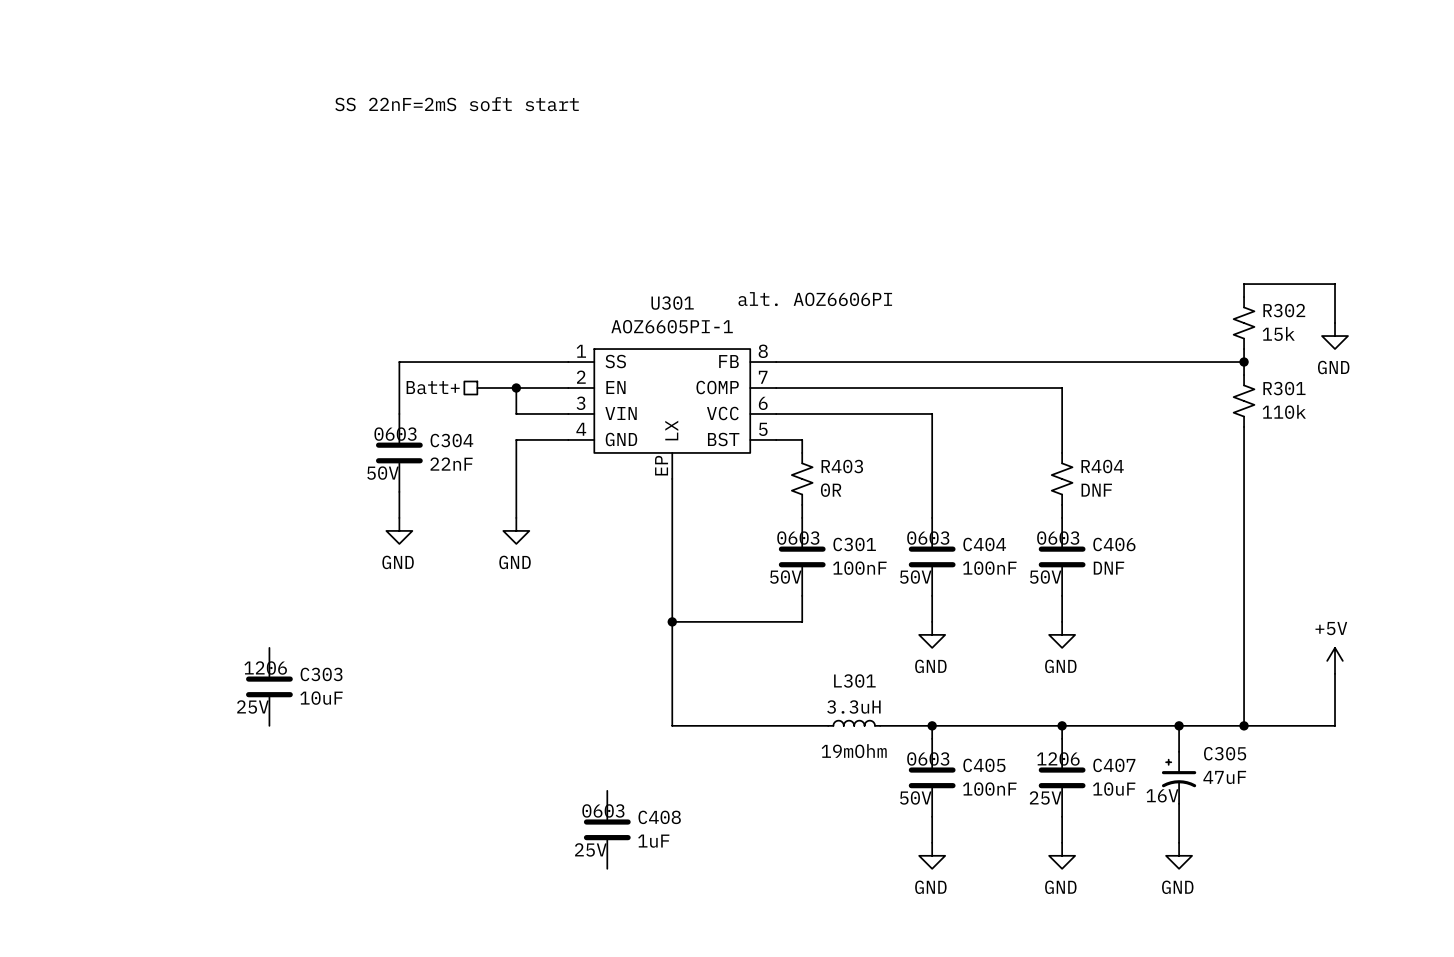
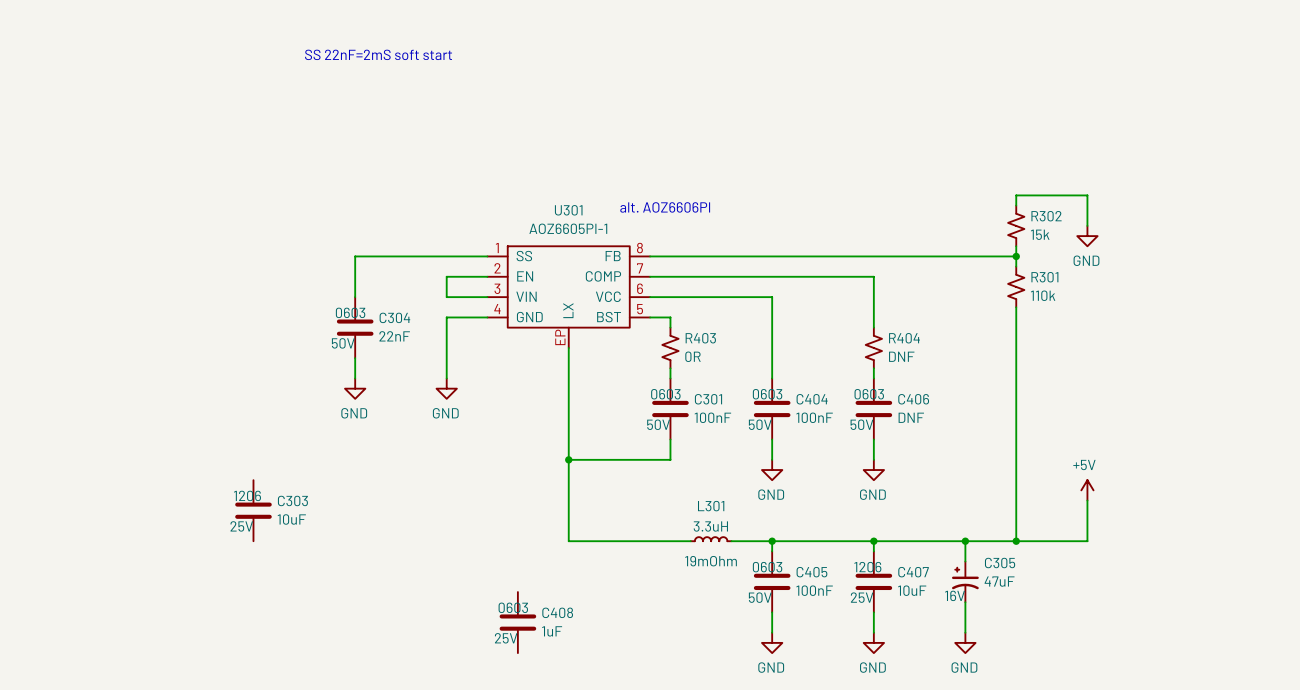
hierarchical label: Batt+ (433, 387) -> none
wire: (477, 388) (516, 388) -> none
junction: (516, 388) -> none

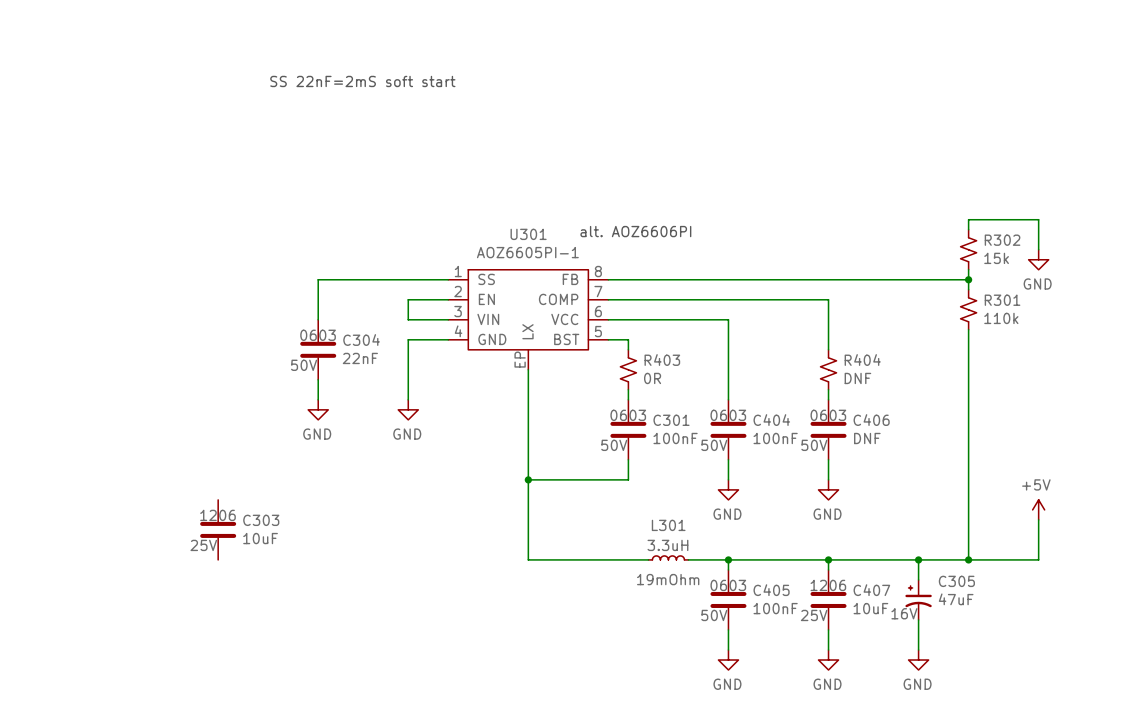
C408: 1uF (517, 622) -> none

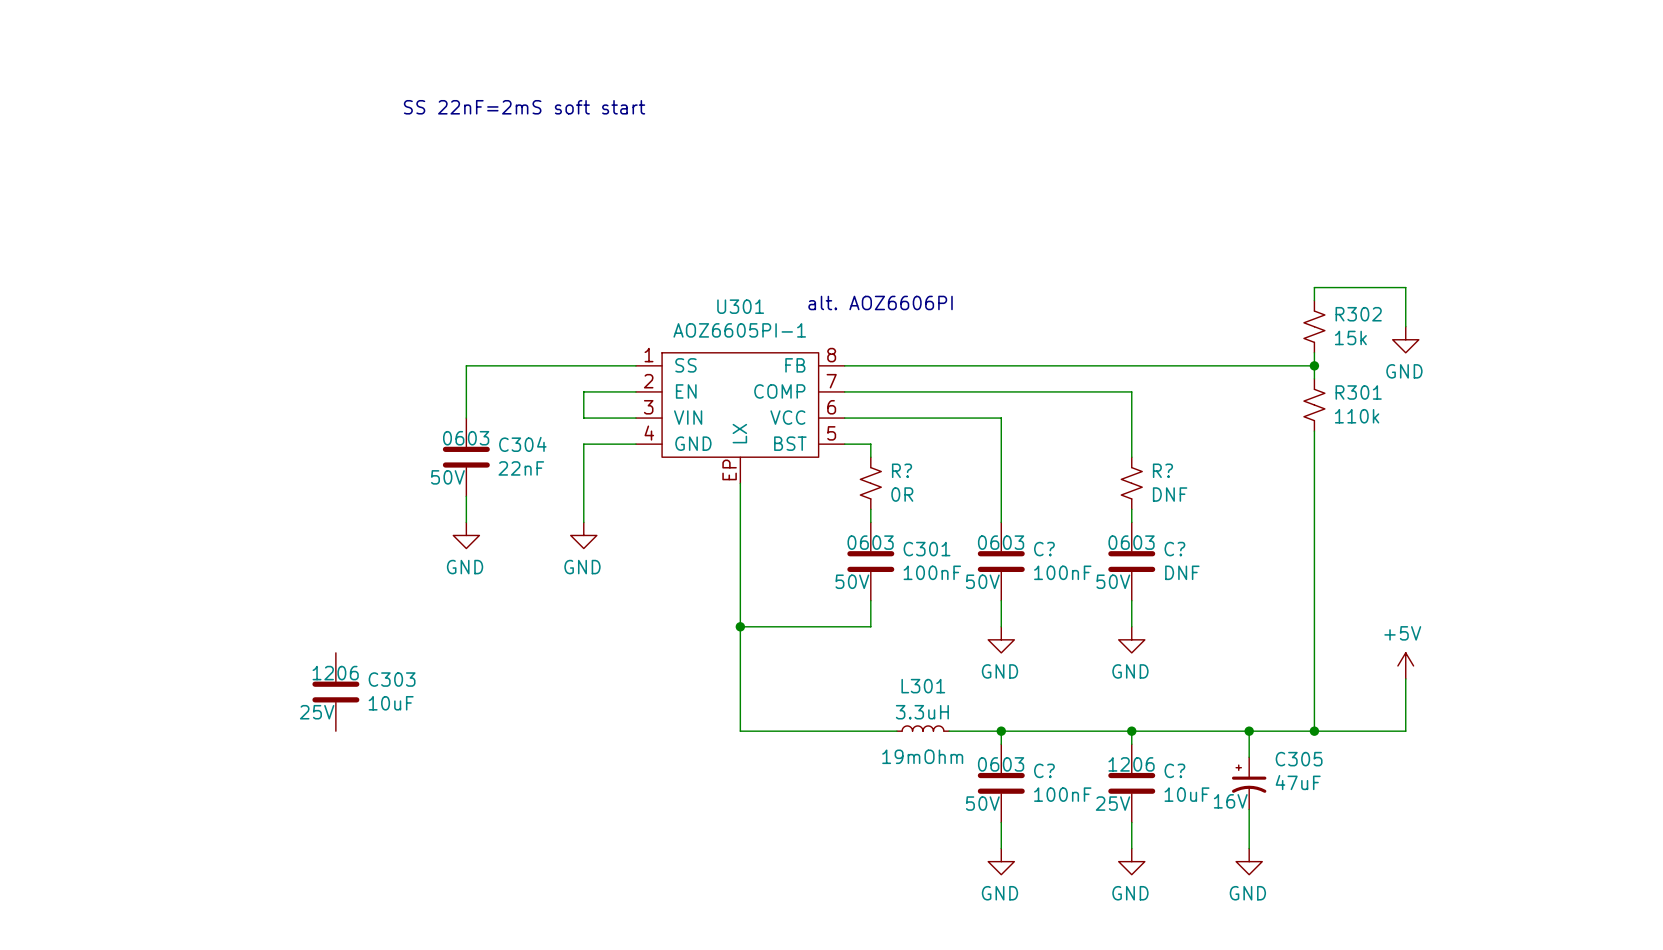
R403 name: R403 (662, 360) -> R? (902, 470)
R404 name: R404 (862, 360) -> R? (1162, 470)
C404 name: C404 (771, 420) -> C? (1044, 549)
C406 name: C406 (871, 420) -> C? (1174, 549)
C405 name: C405 (771, 590) -> C? (1044, 770)
C407 name: C407 (871, 590) -> C? (1174, 770)

